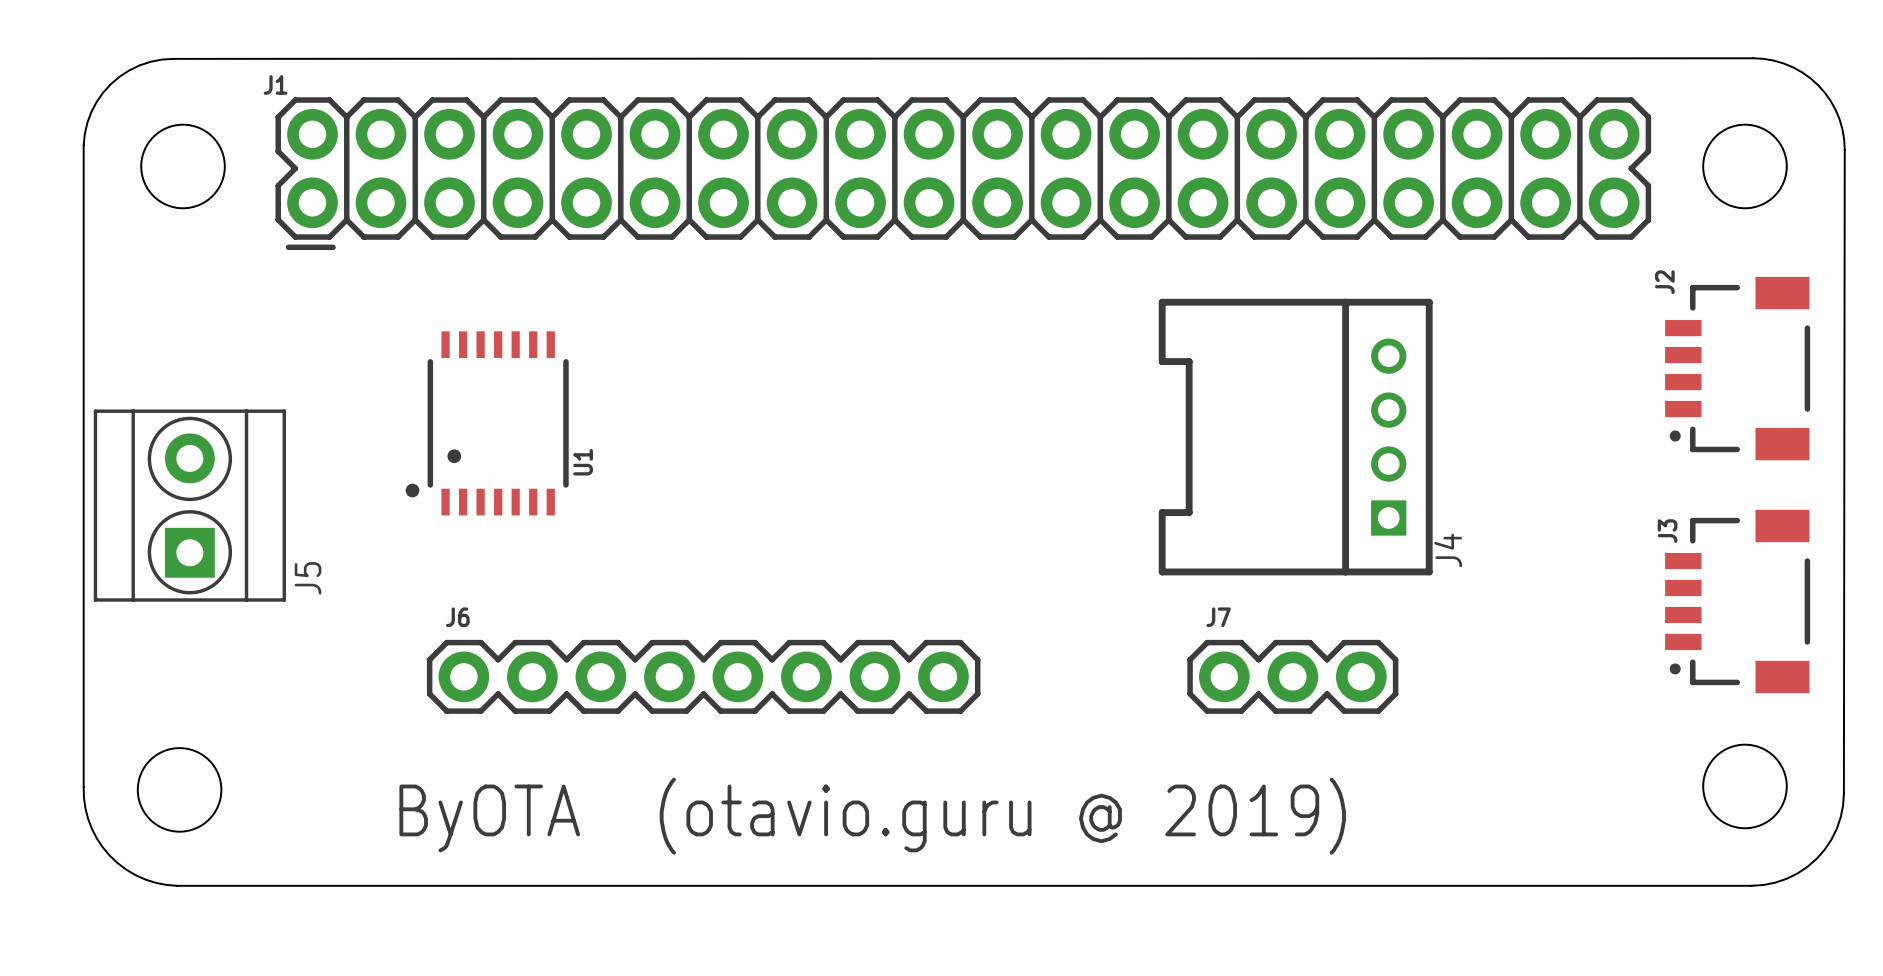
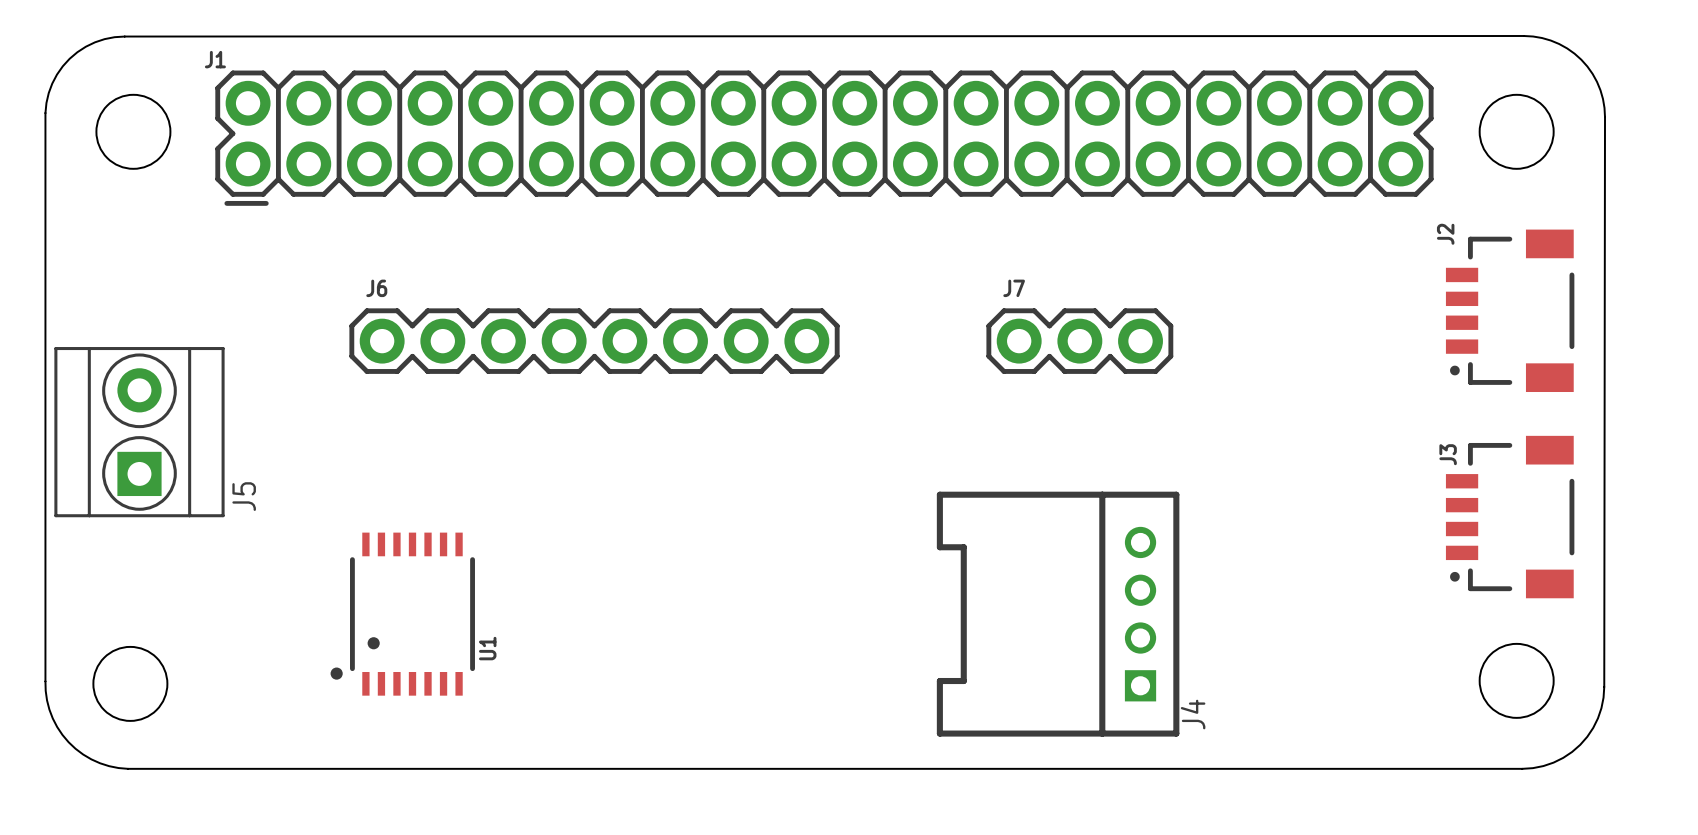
U1 position: (487, 423) -> (402, 614)
J4 position: (1295, 437) -> (1058, 614)
J6 position: (703, 676) -> (594, 341)
J7 position: (1292, 676) -> (1079, 341)
text: (otavio.guru @ 2019) (1002, 816) -> none
text: ByOTA (489, 818) -> none

